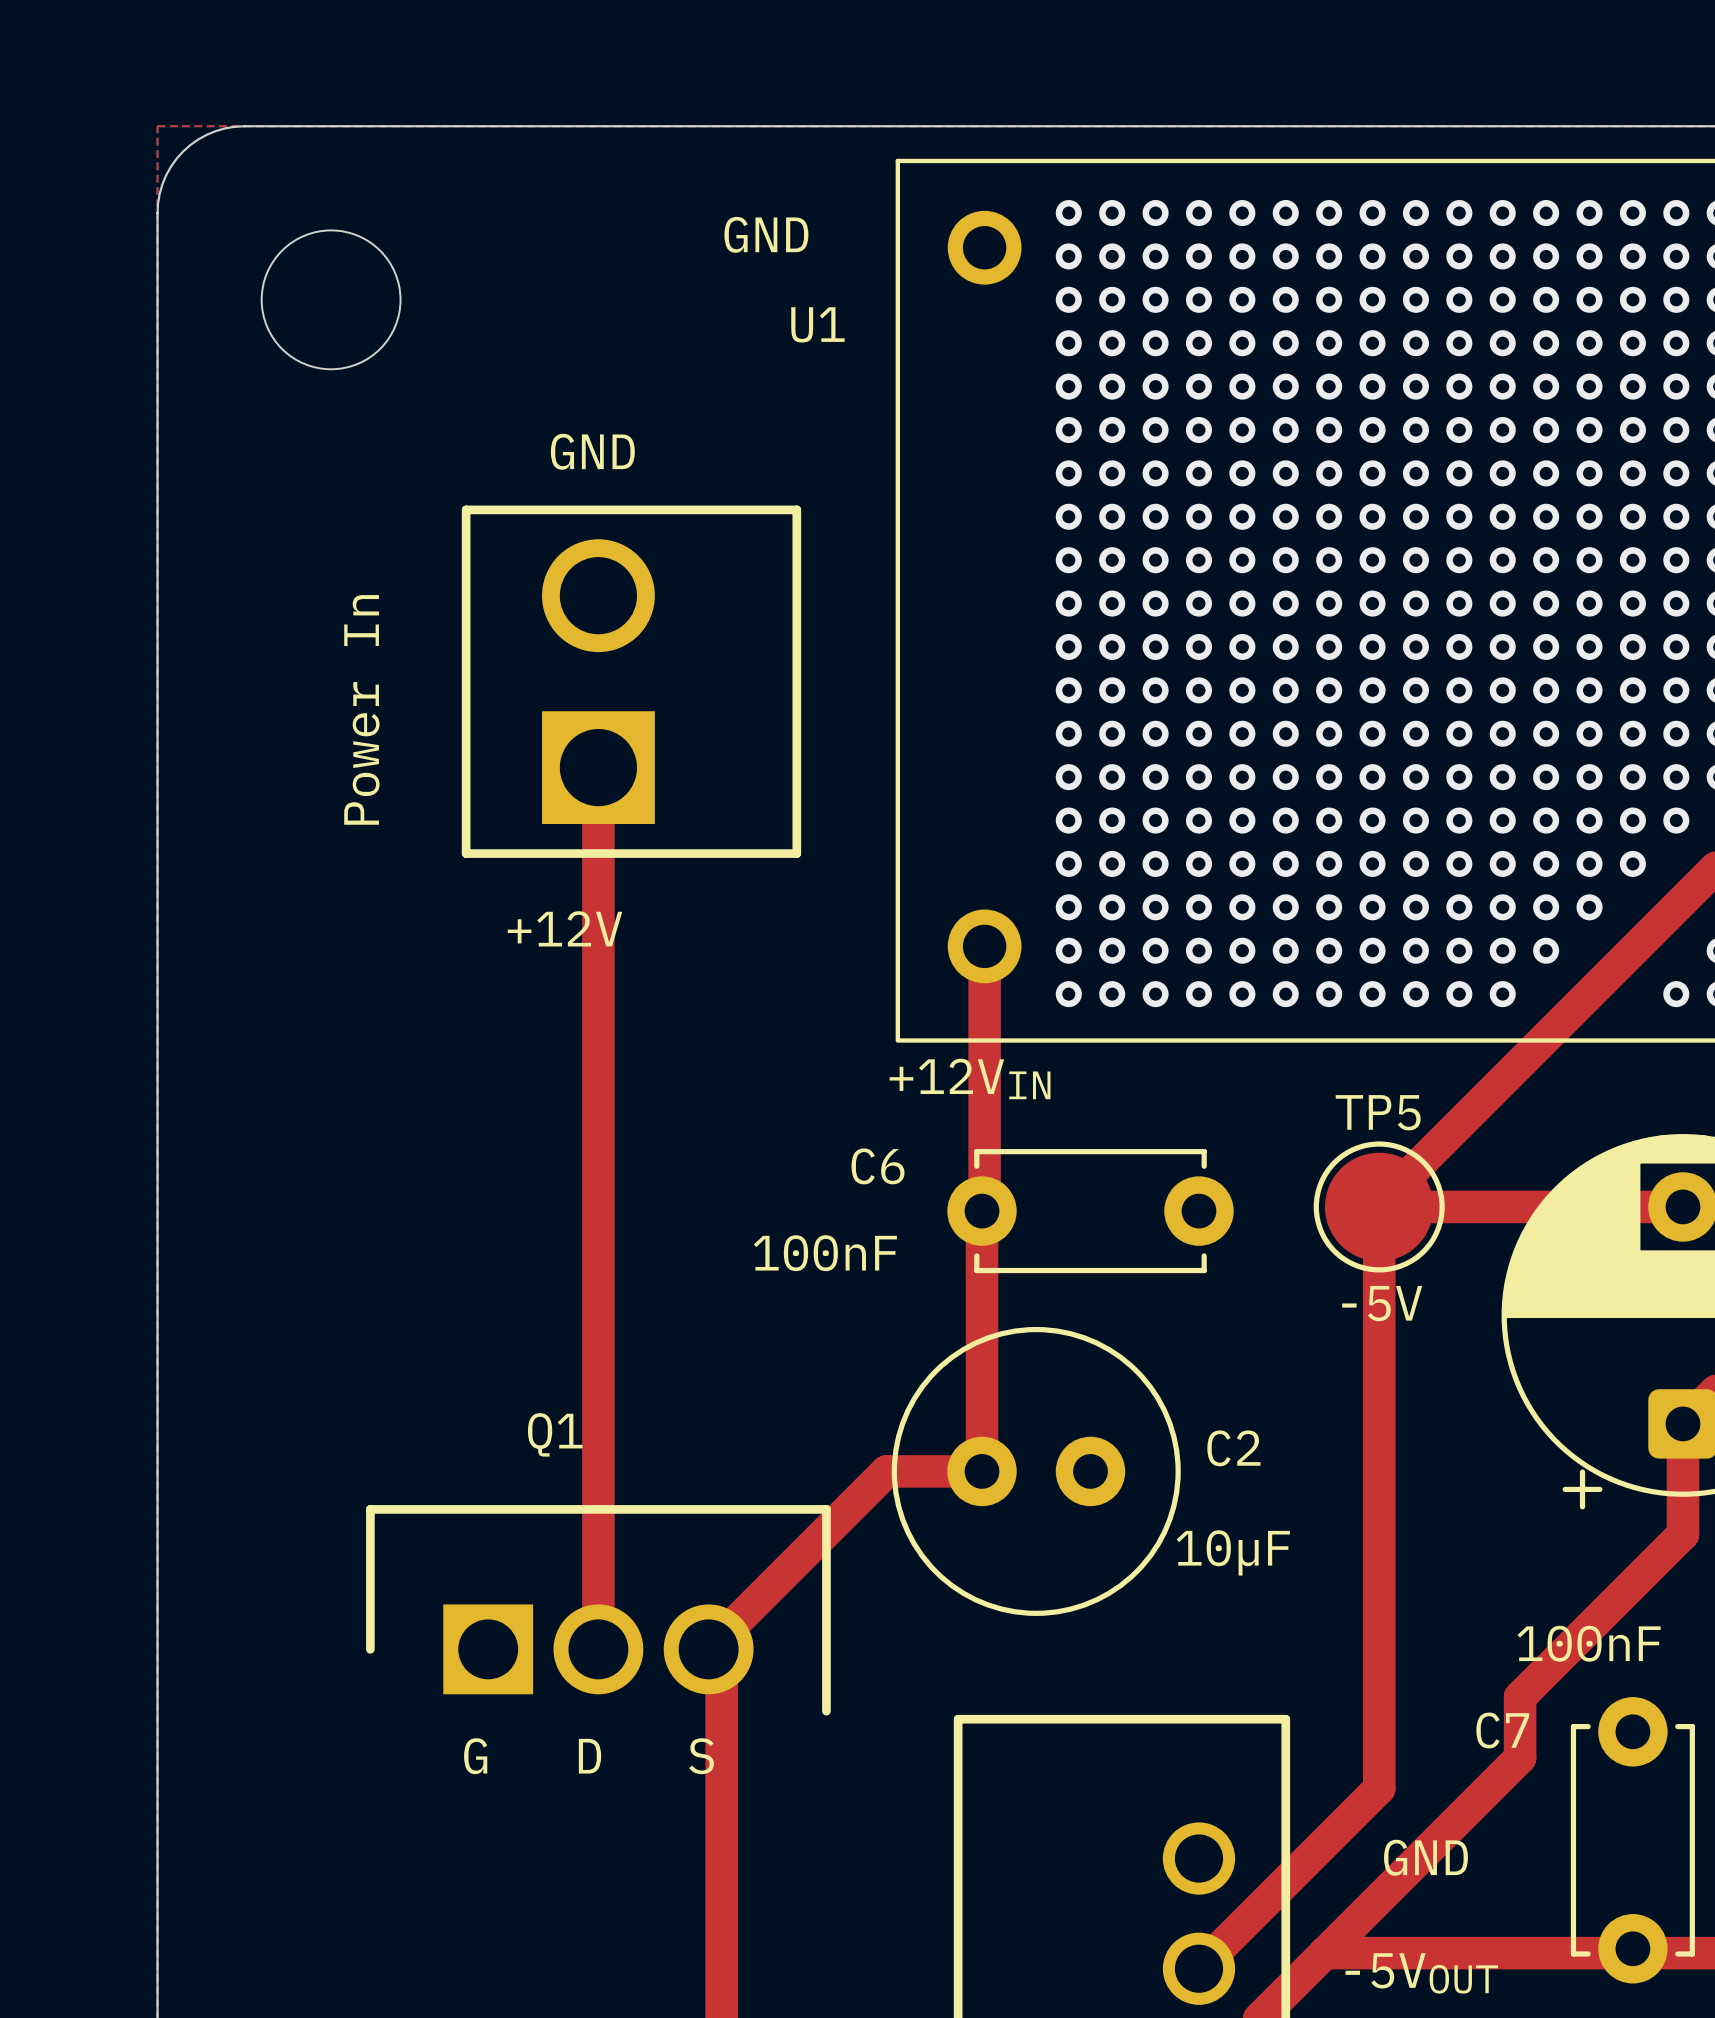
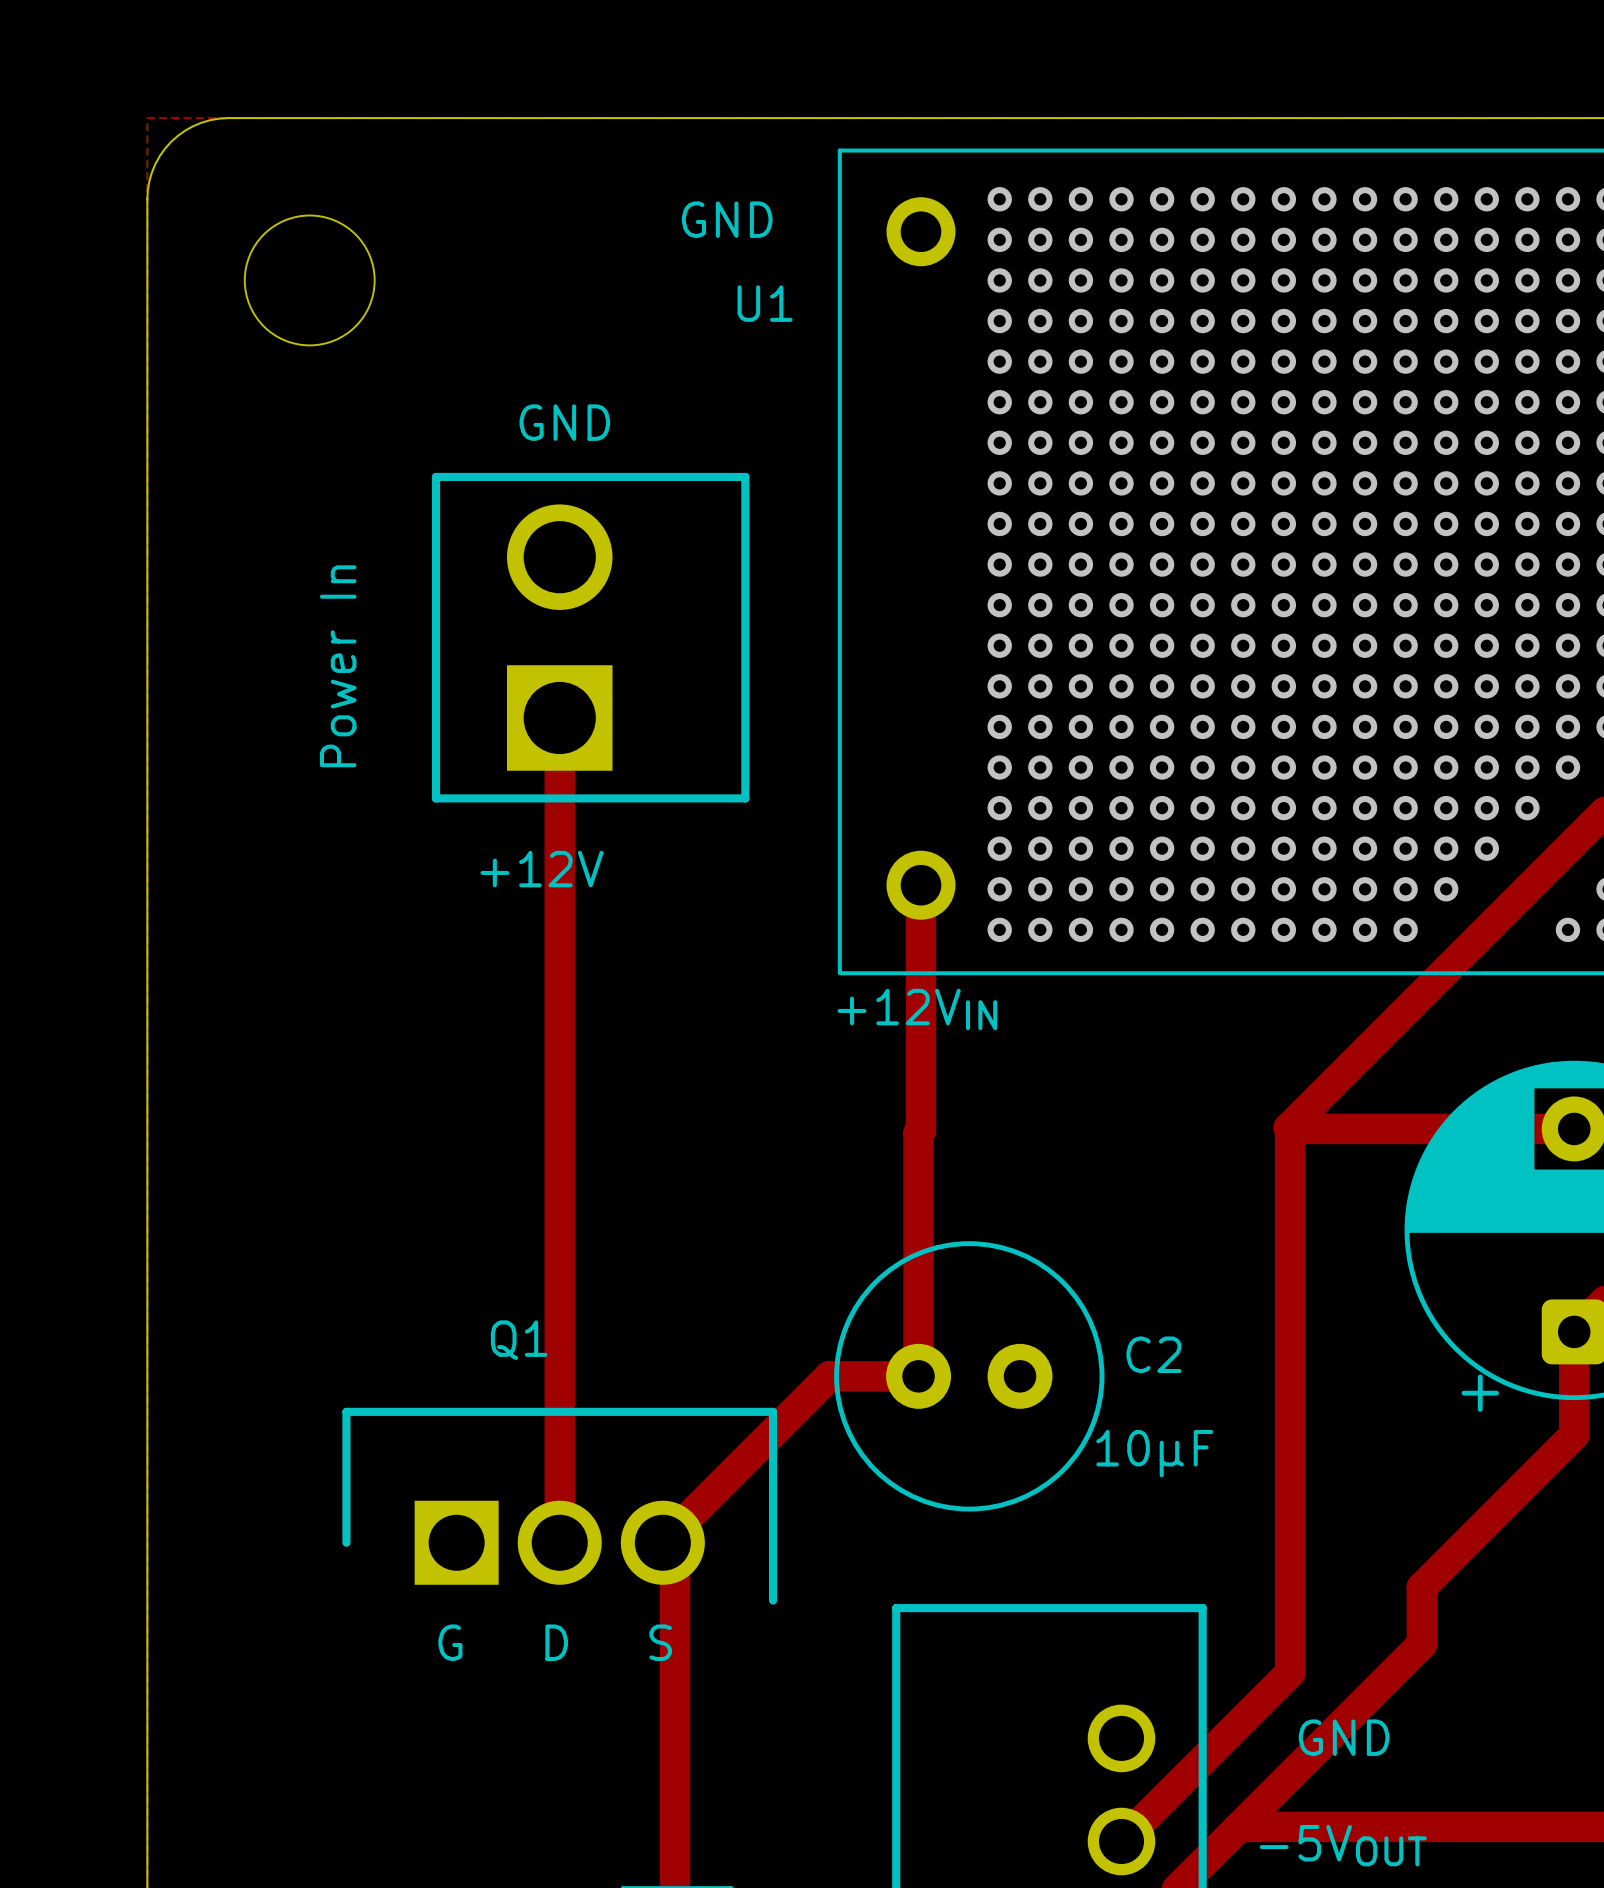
TP5: -5V (1379, 1206) -> none
C6: 100nF (1090, 1211) -> none
C7: 100nF (1632, 1840) -> none

